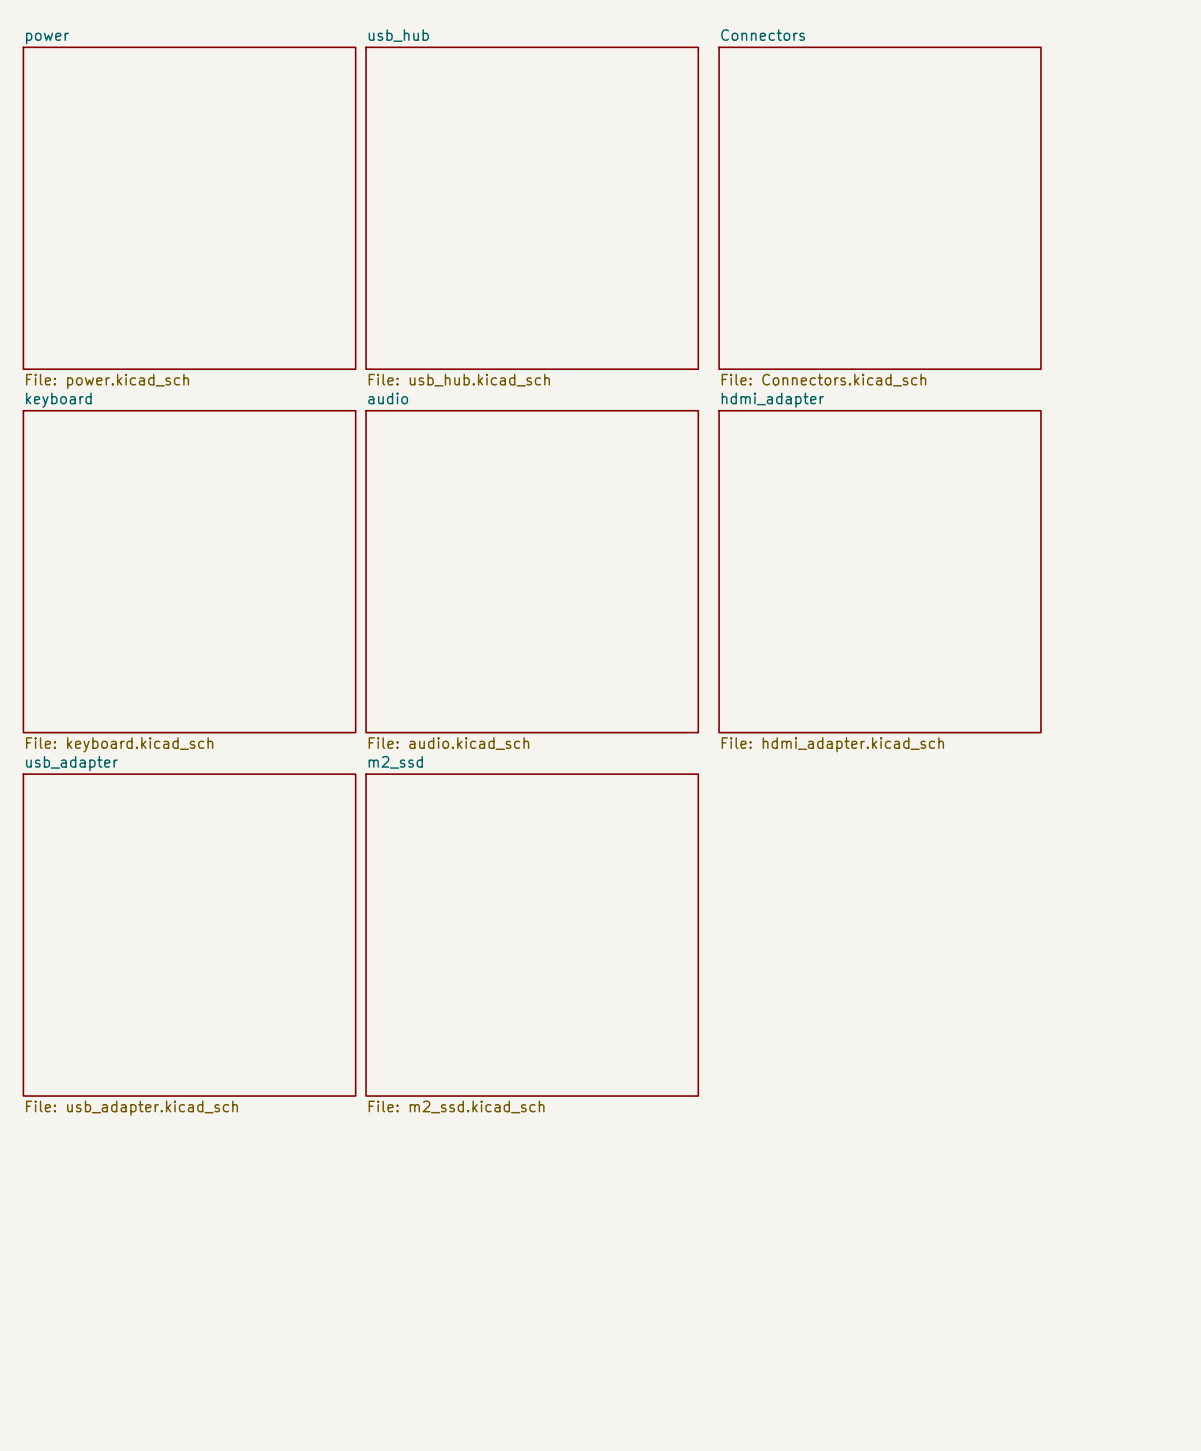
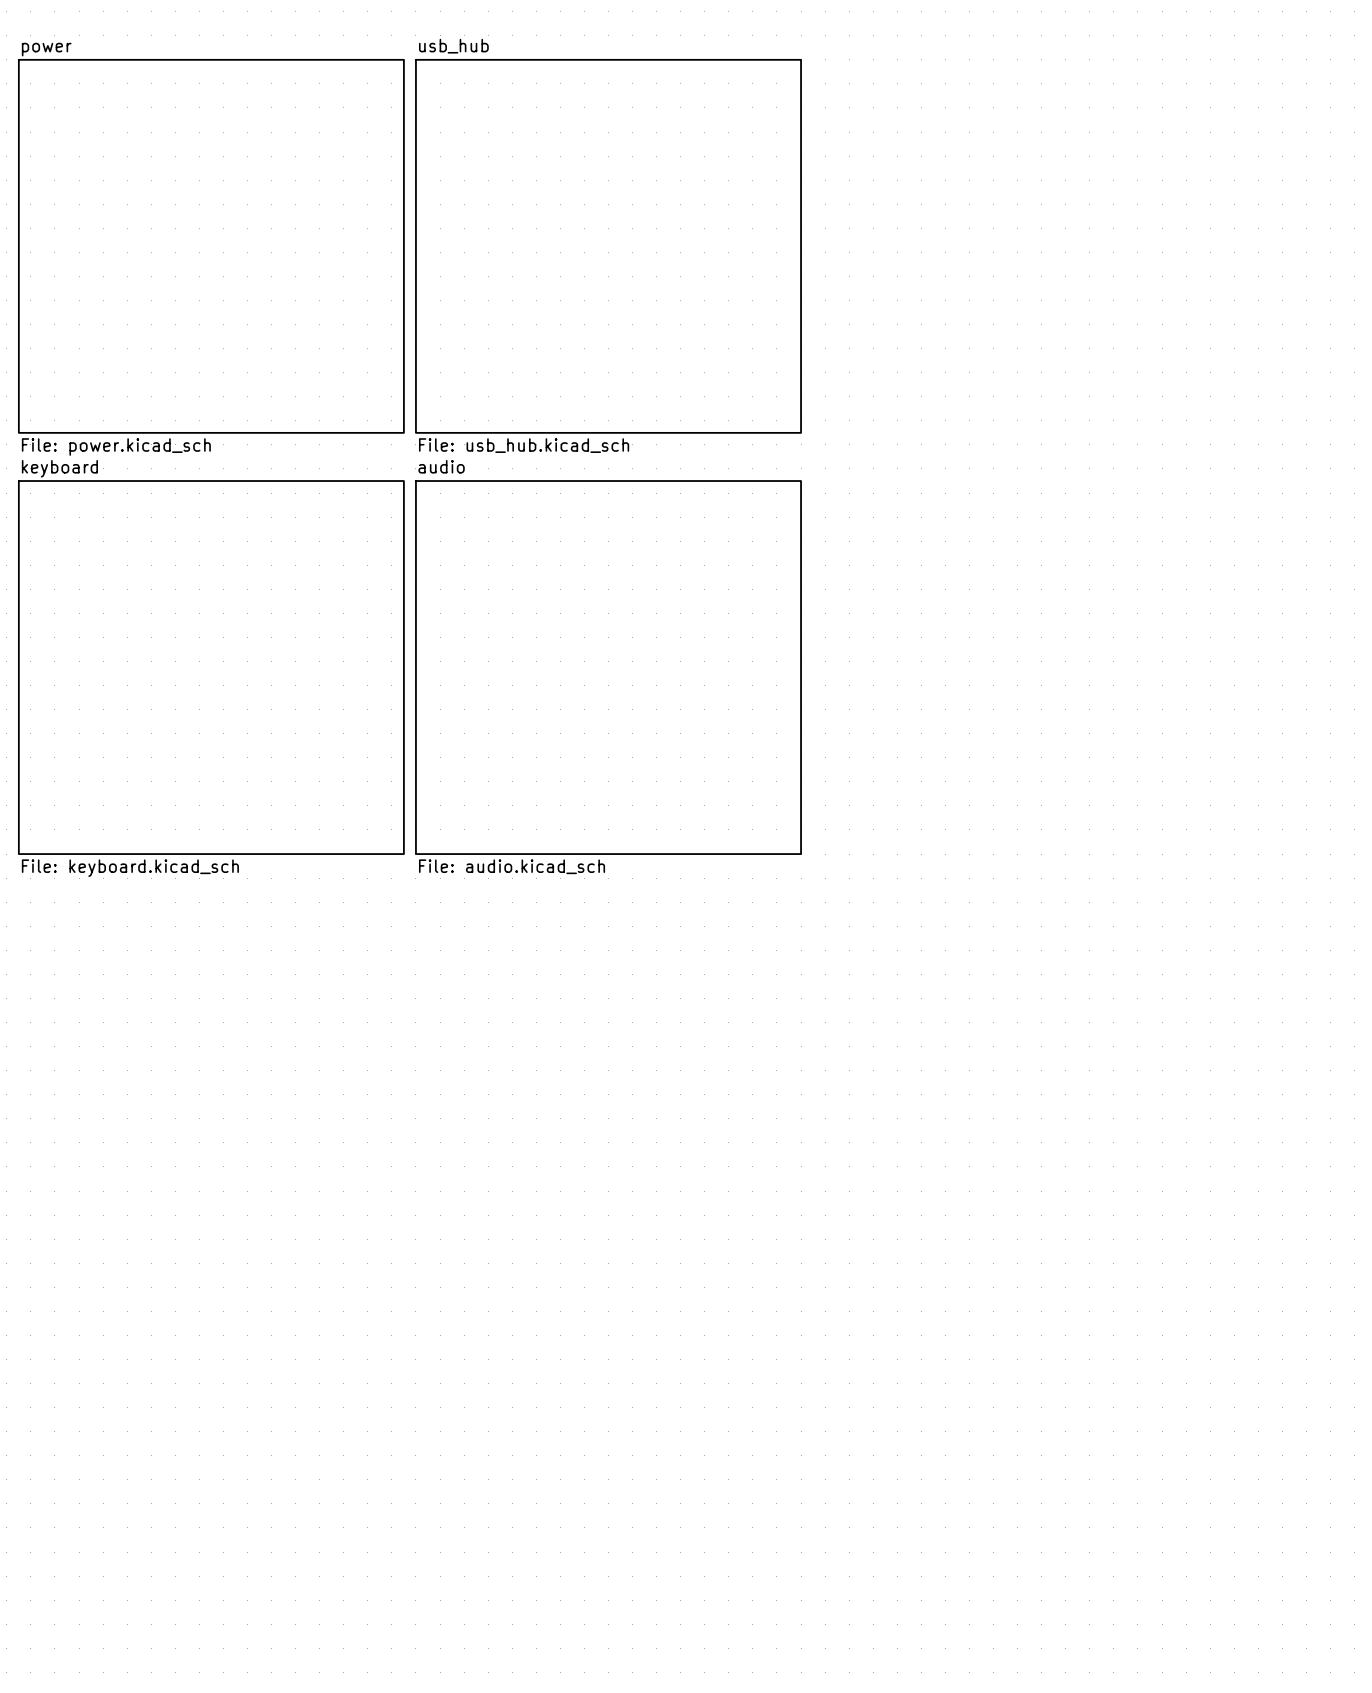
sheet Connectors: File: Connectors.kicad_sch (880, 208) -> none
sheet hdmi_adapter: File: hdmi_adapter.kicad_sch (880, 571) -> none
sheet usb_adapter: File: usb_adapter.kicad_sch (189, 935) -> none
sheet m2_ssd: File: m2_ssd.kicad_sch (532, 935) -> none

